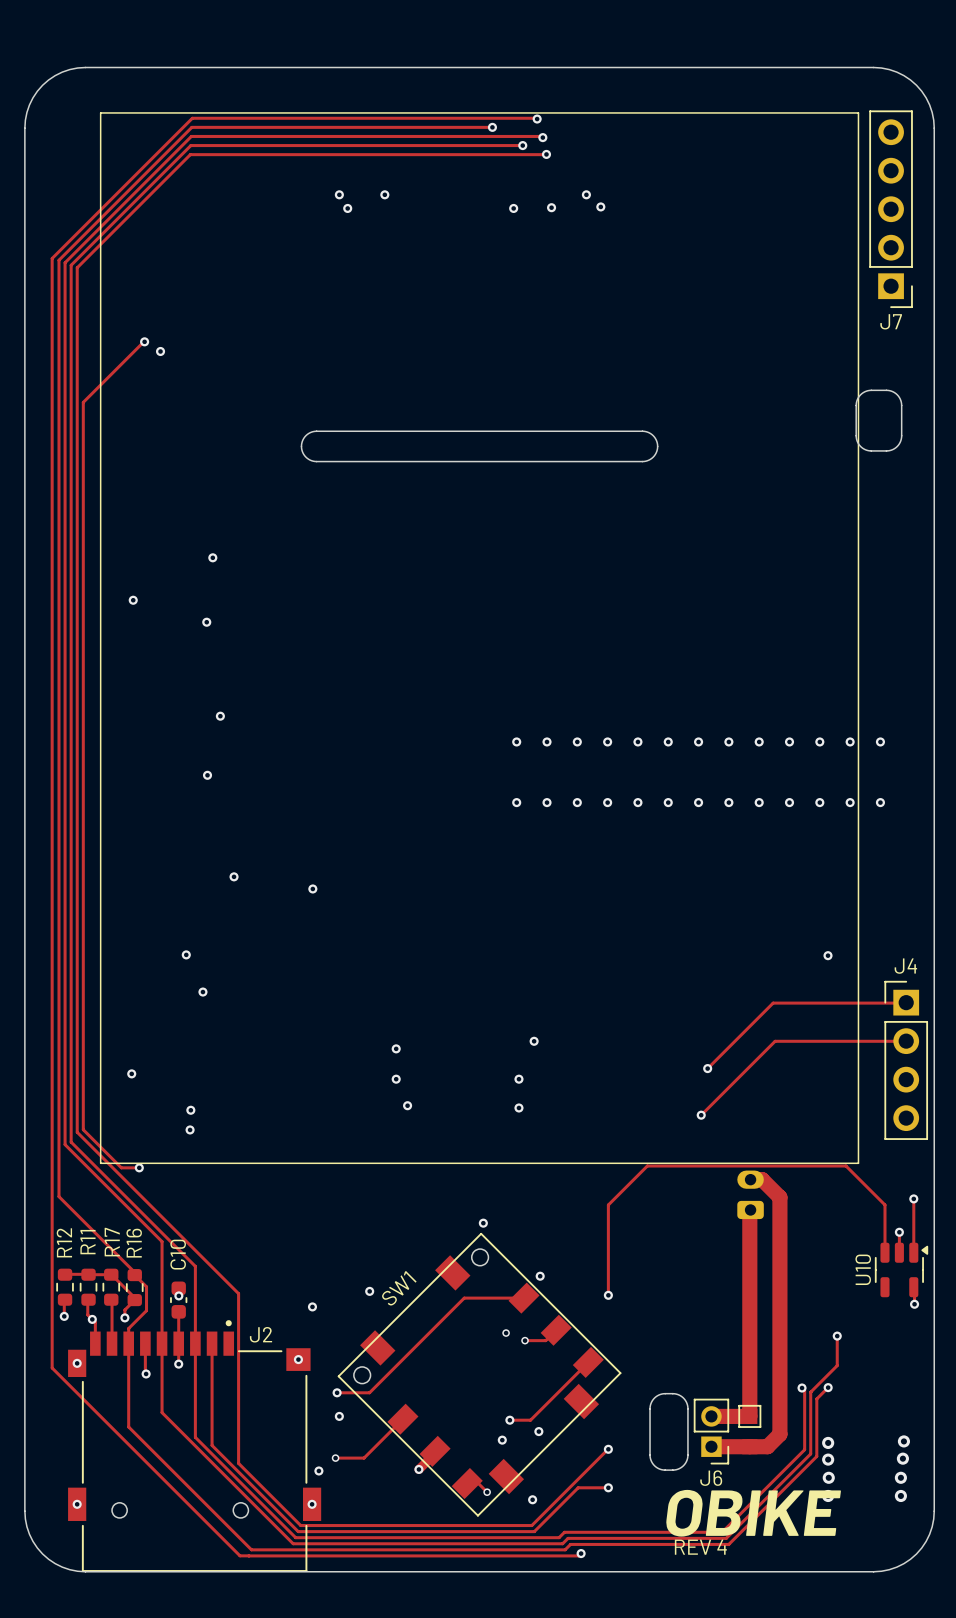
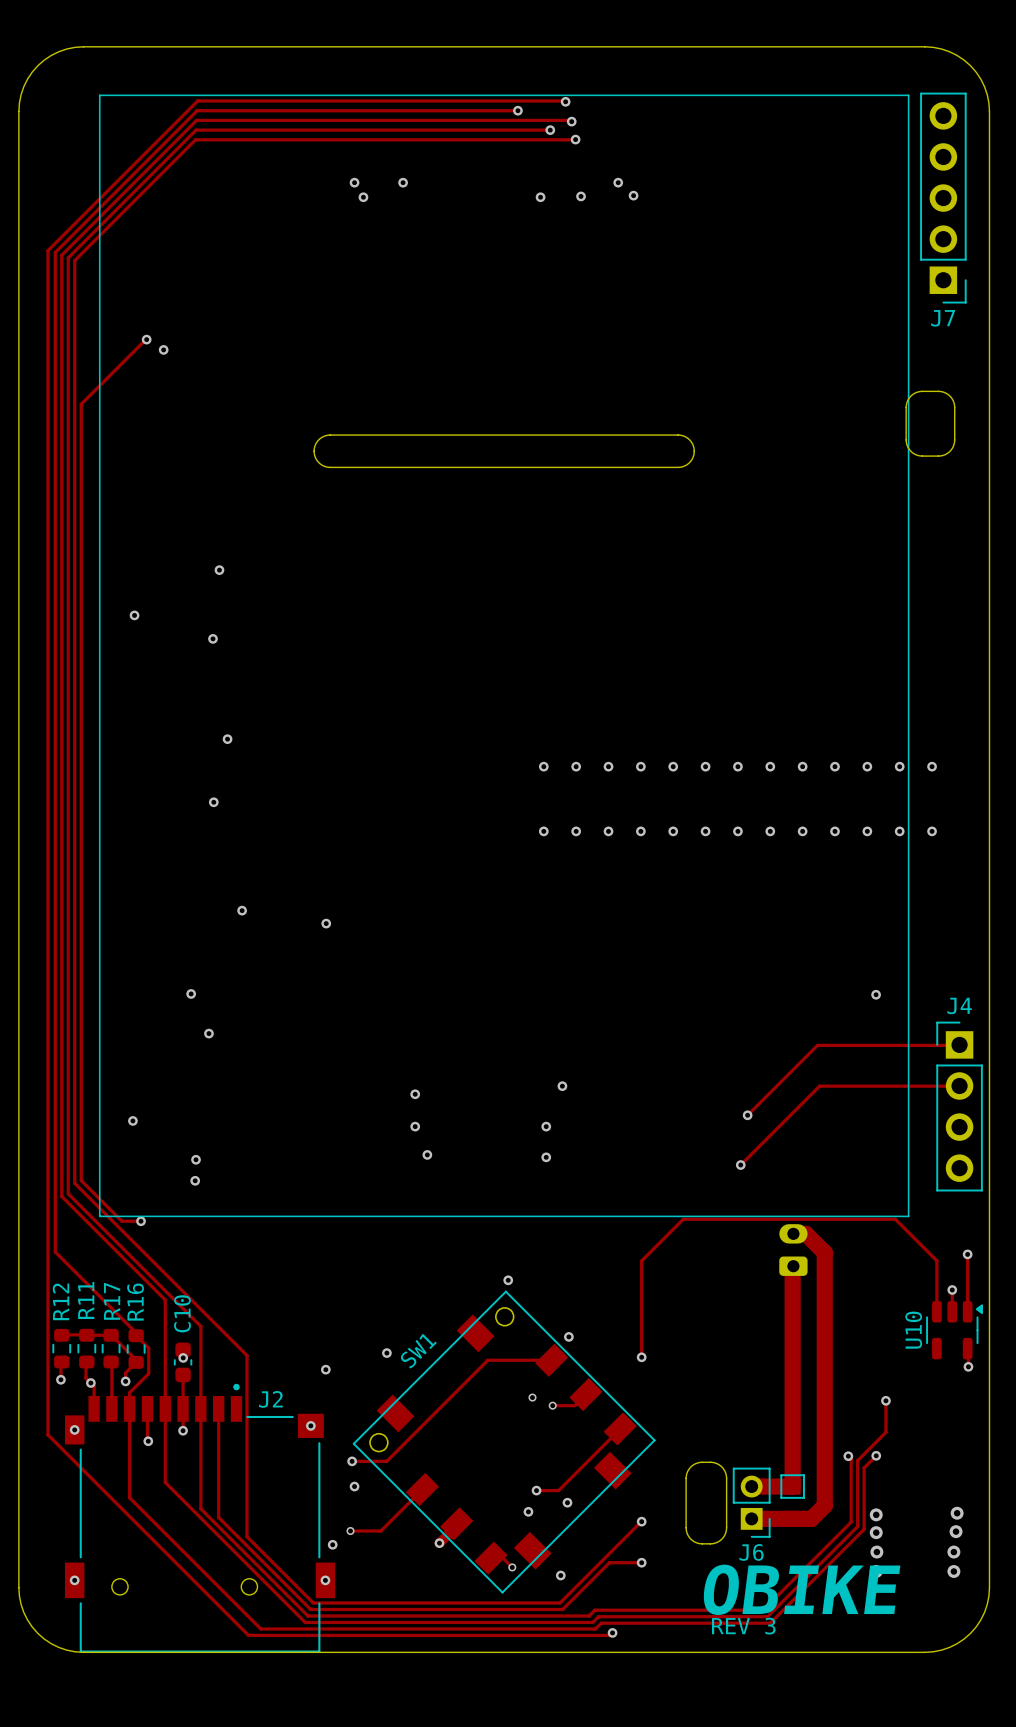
text: REV 4 (700, 1547) -> REV 3 (743, 1626)

